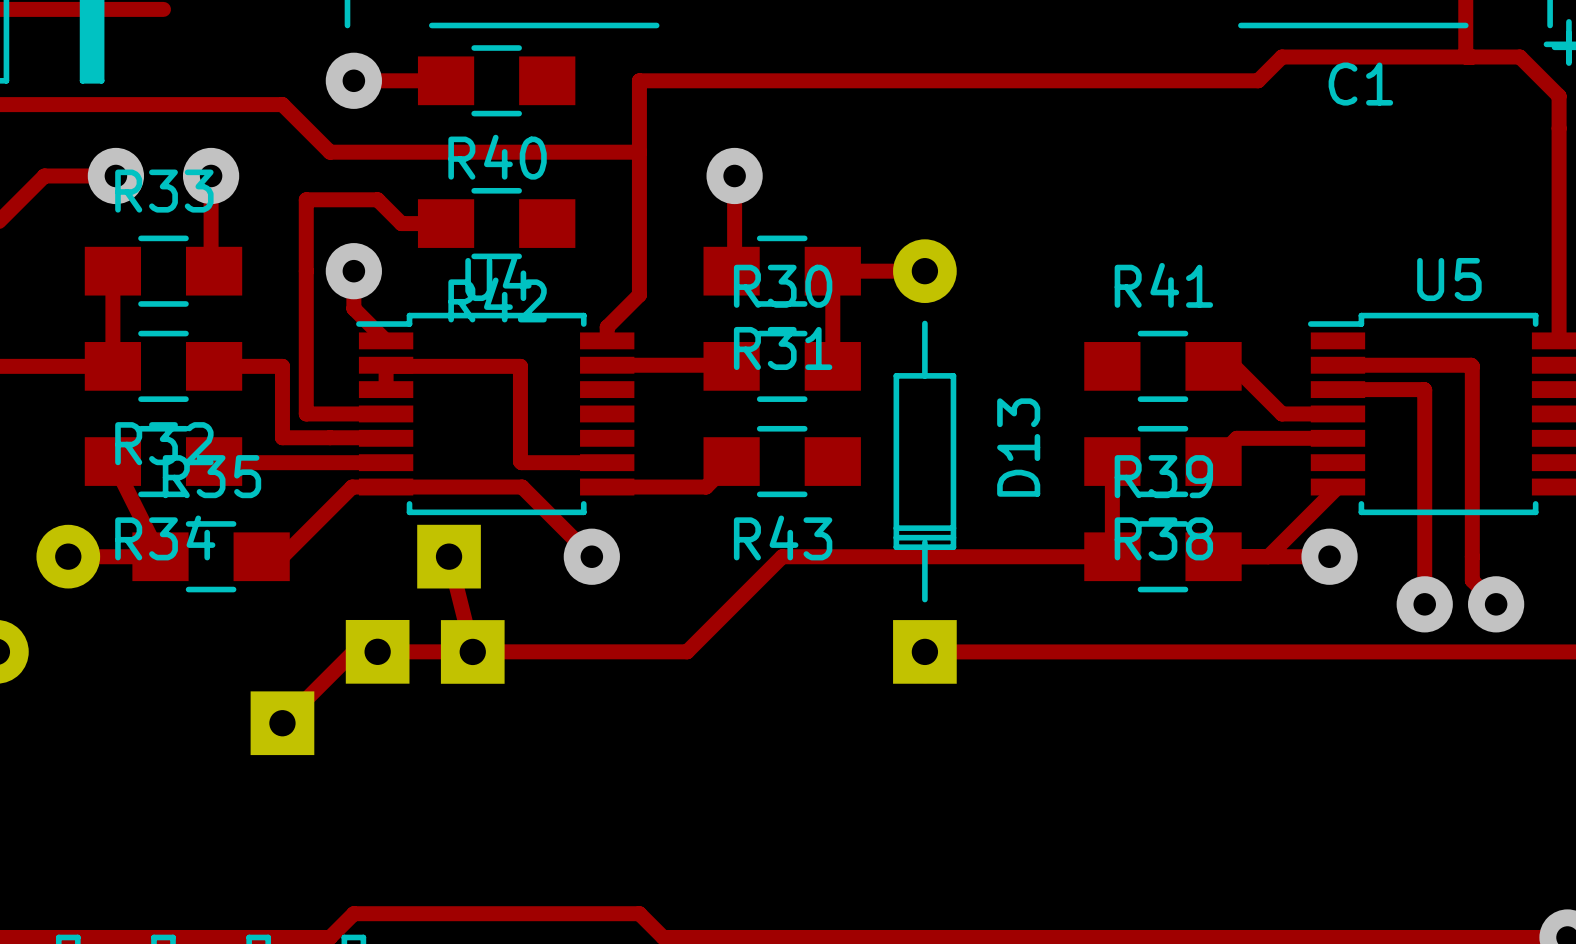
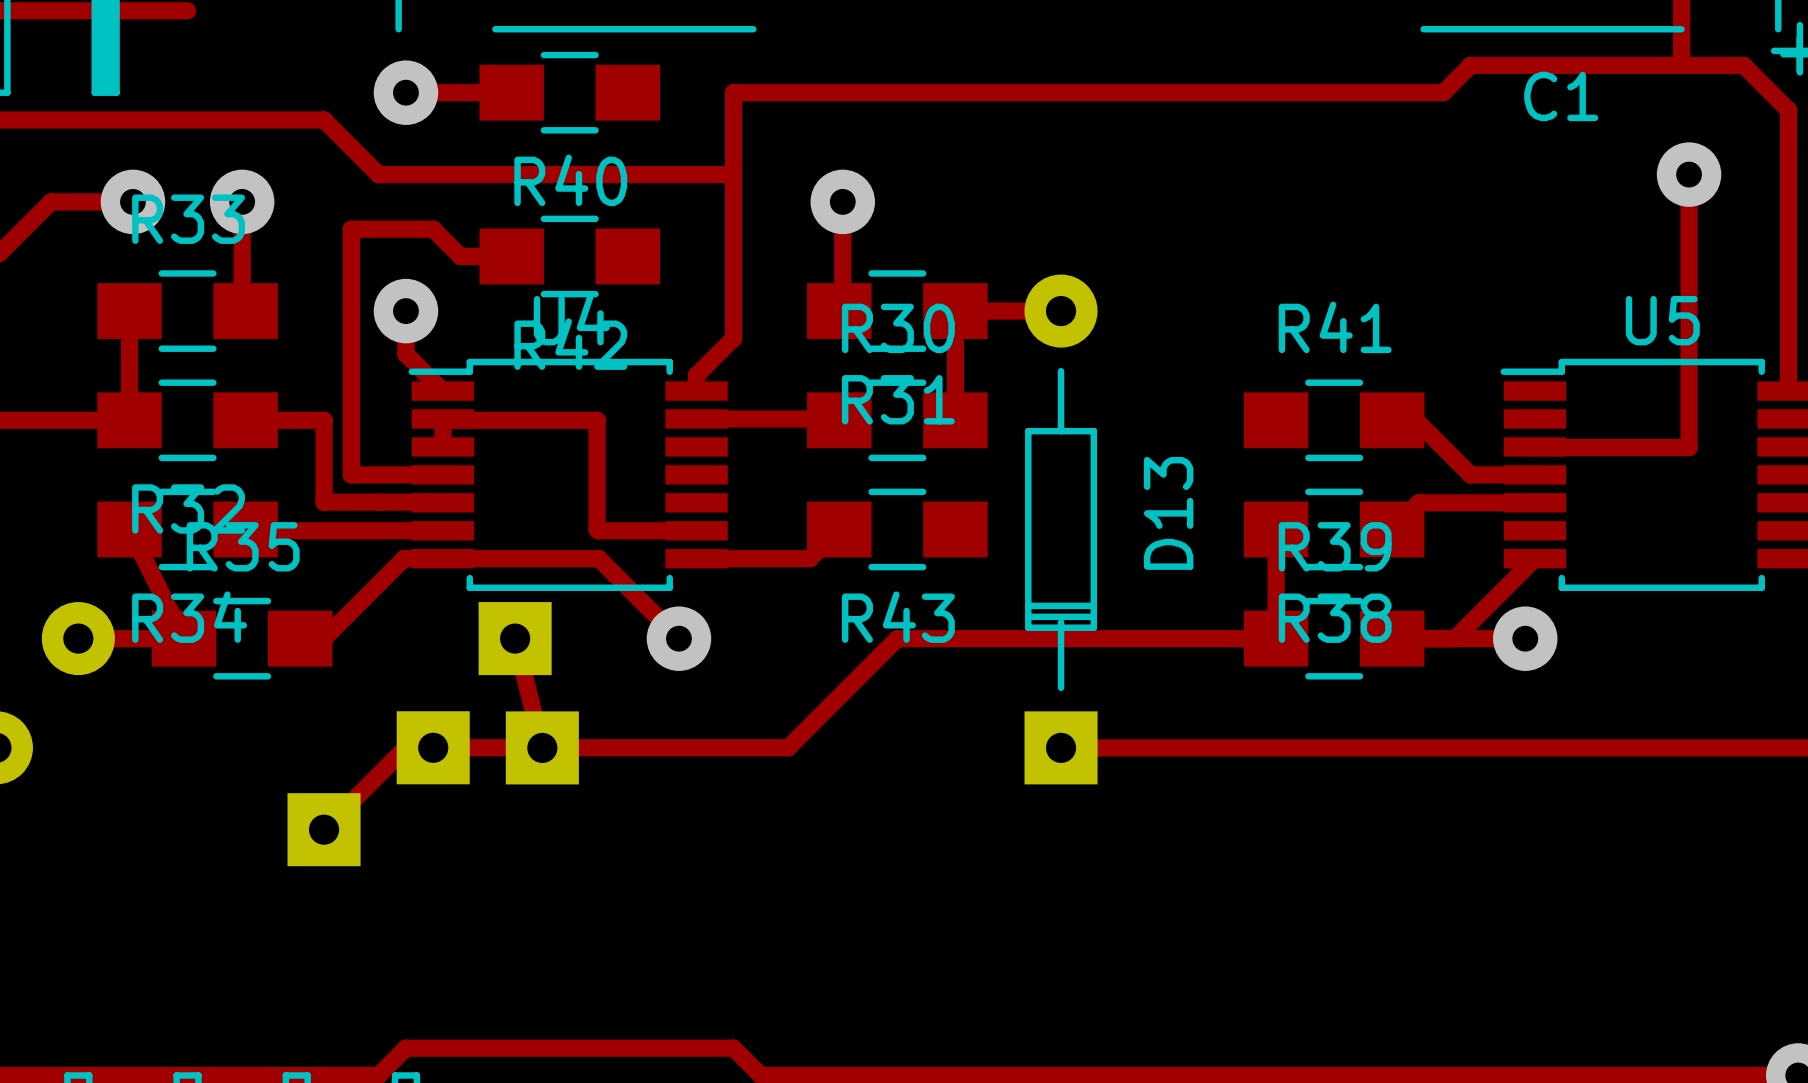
via: none -> (1689, 174)
track: (1337, 365) (1472, 366) -> (1689, 174) (1689, 420)
track: (1337, 389) (1424, 390) (1424, 604) -> (1535, 447) (1689, 447)
track: (1472, 390) (1472, 580) (1496, 604) -> none
via: (1424, 604) -> none
via: (1496, 604) -> none

